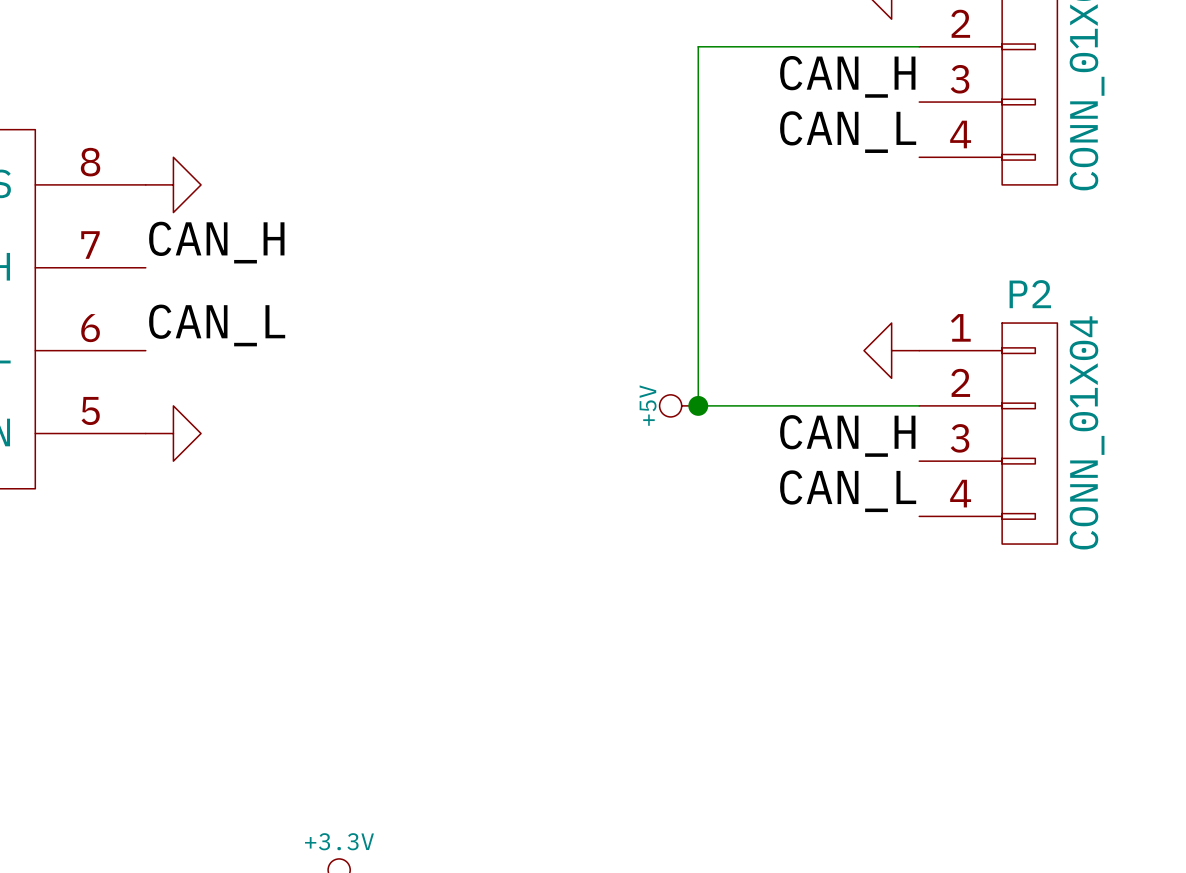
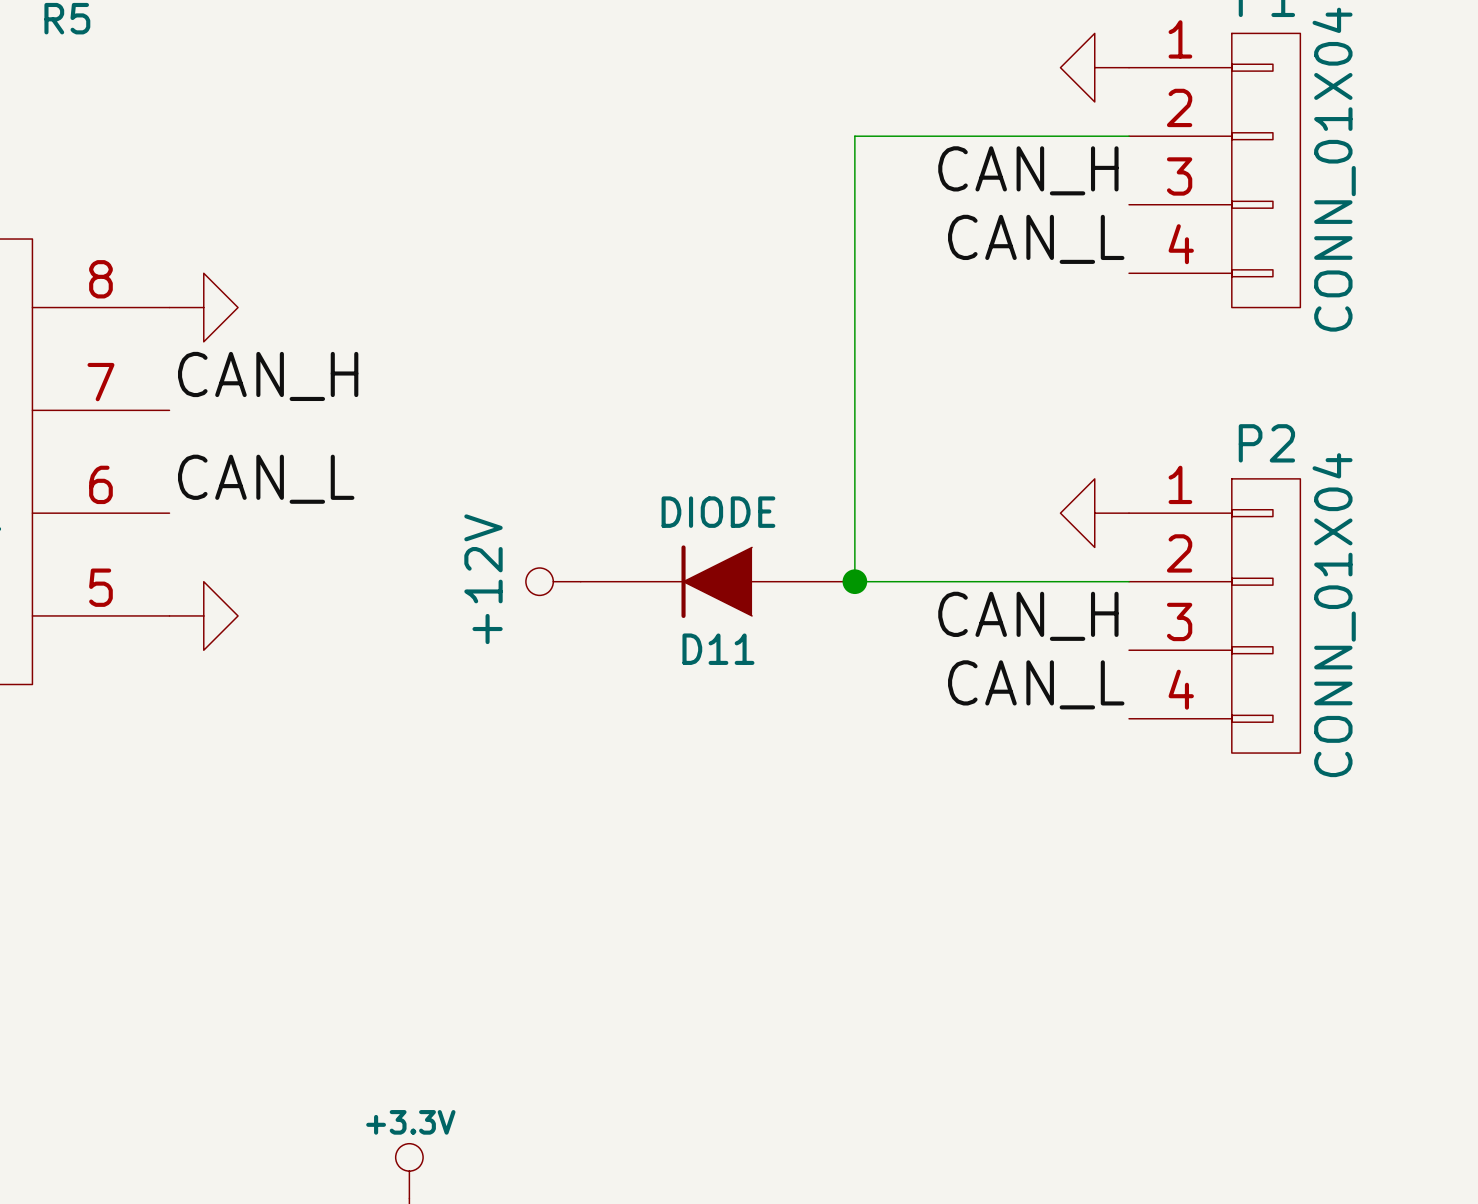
power symbol: none -> +12V (553, 581)
D11: none -> DIODE (717, 581)
power symbol: +5V (678, 405) -> none

